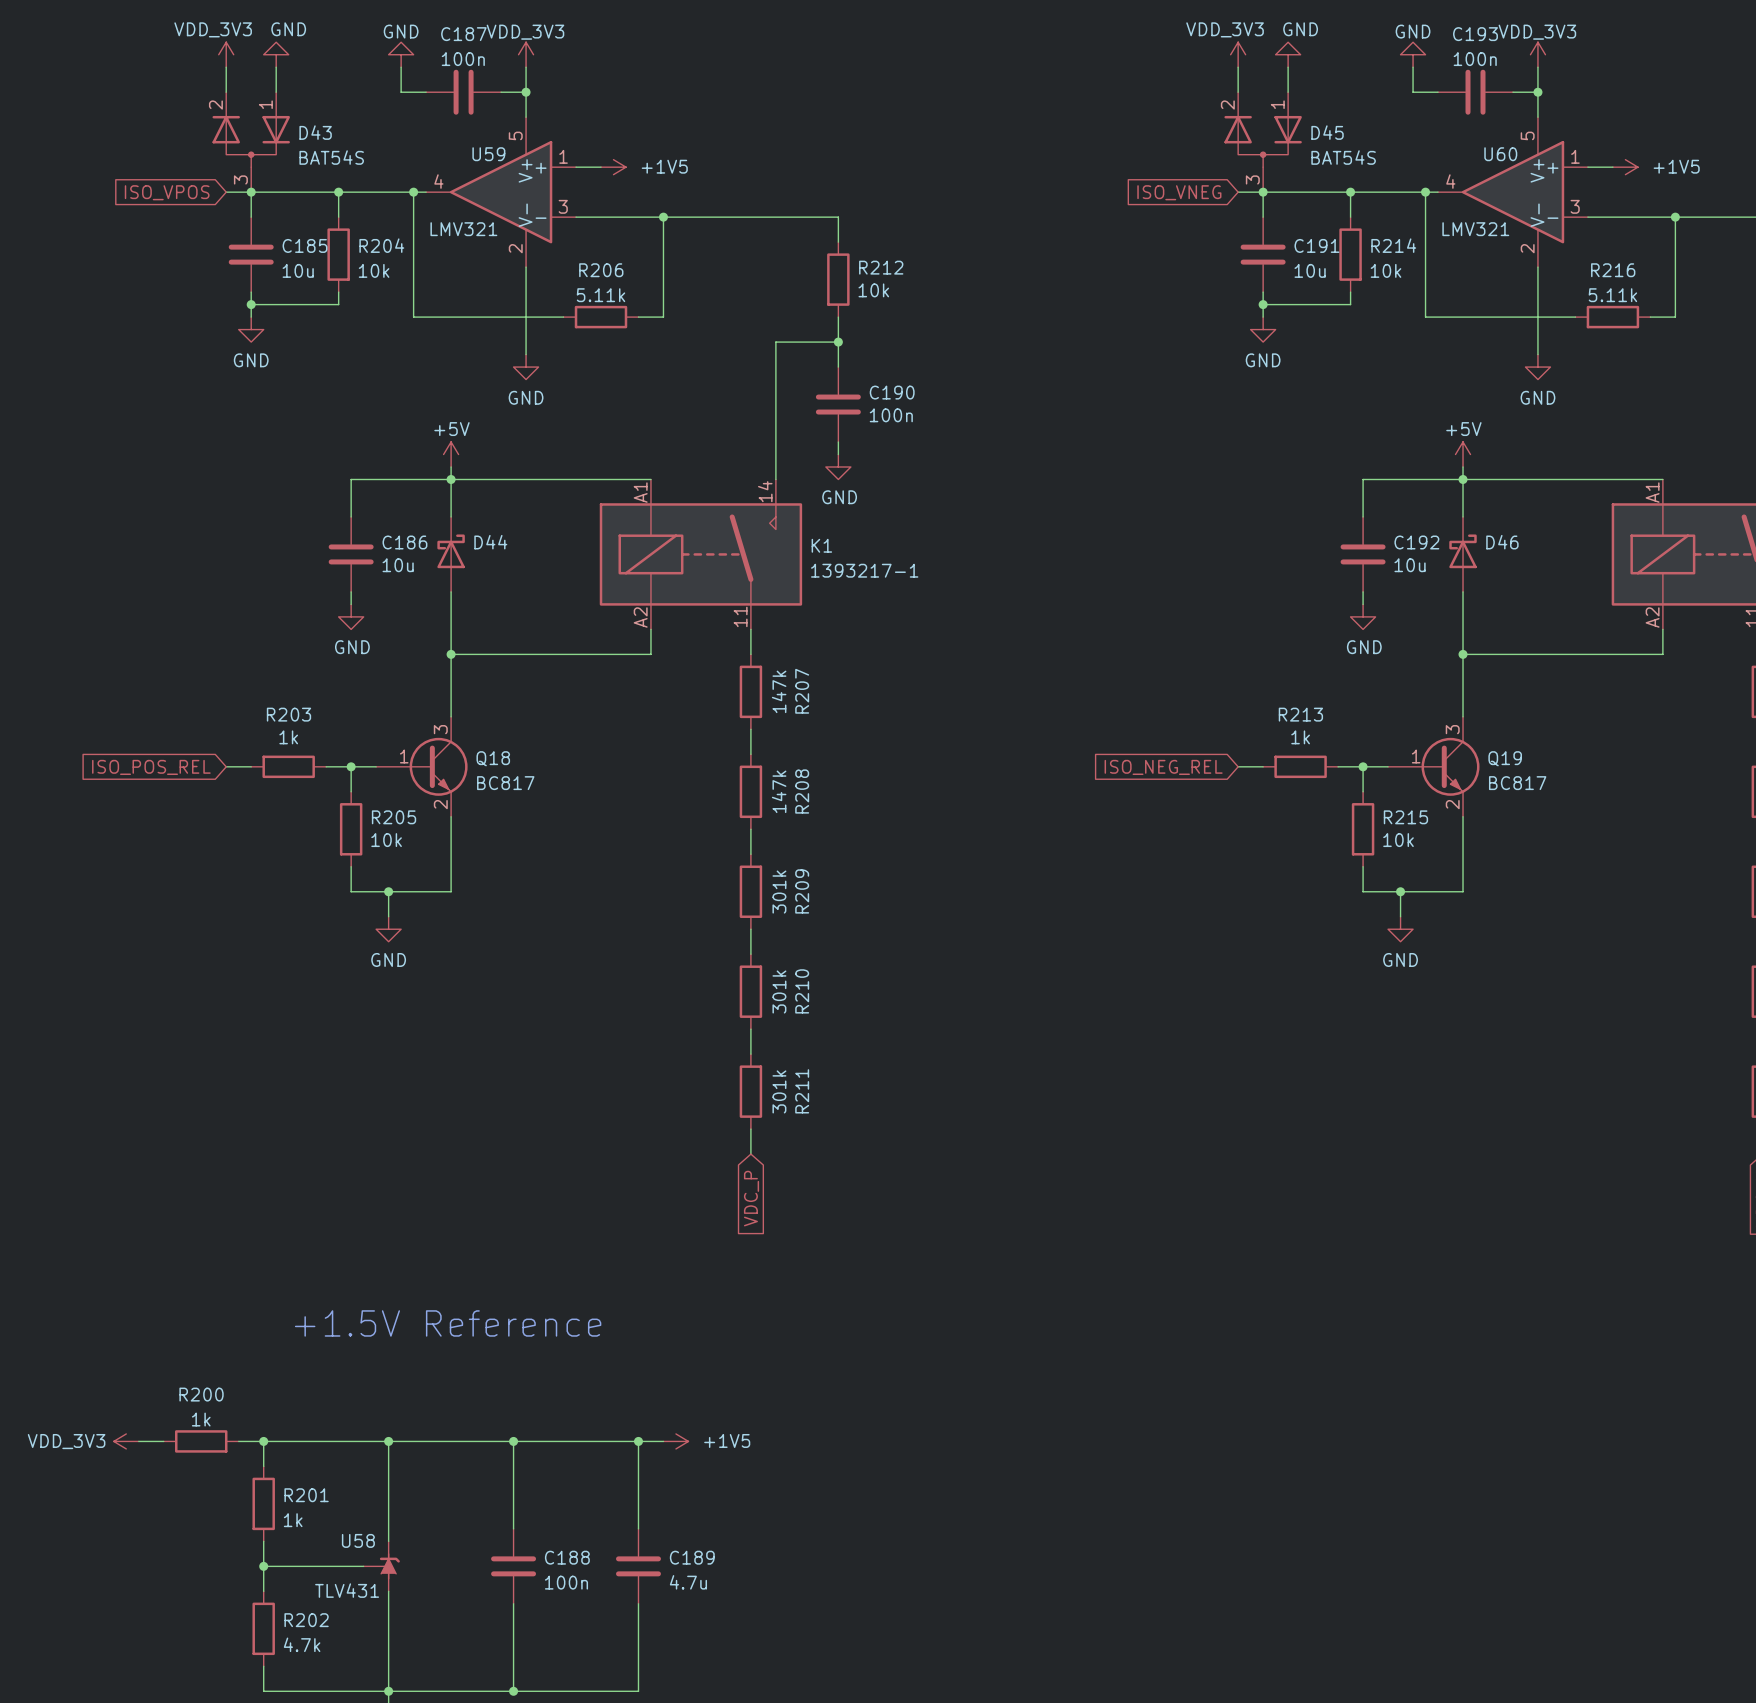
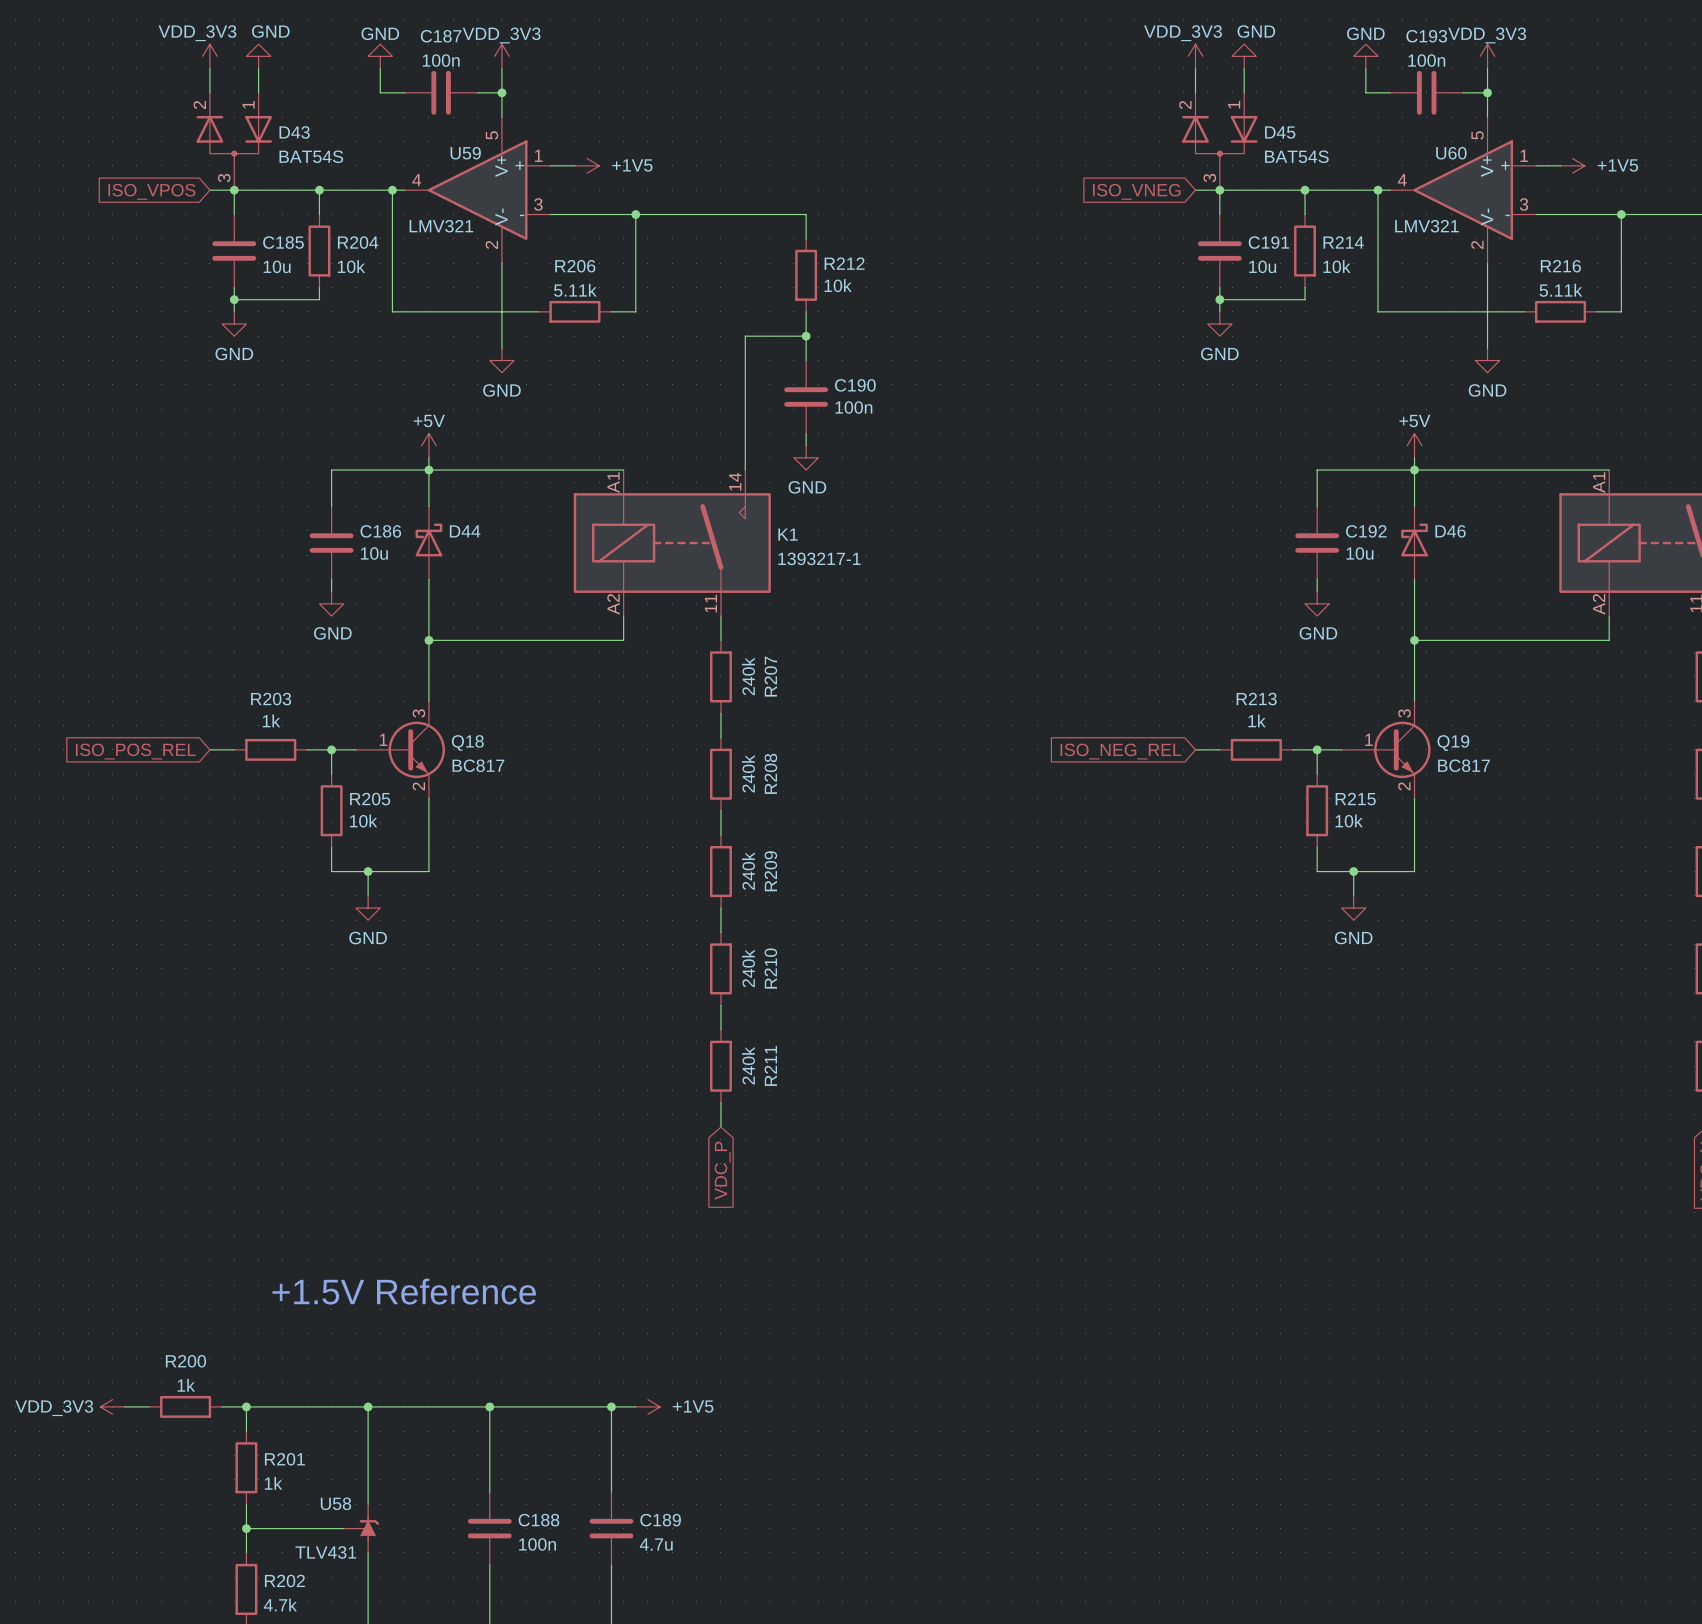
R207 value: 147k (779, 691) -> 240k (748, 676)
R208 value: 147k (779, 791) -> 240k (748, 773)
R209 value: 301k (779, 892) -> 240k (748, 871)
R210 value: 301k (779, 991) -> 240k (748, 968)
R211 value: 301k (779, 1091) -> 240k (748, 1065)

